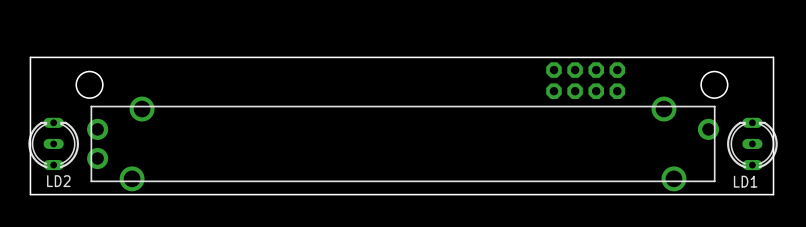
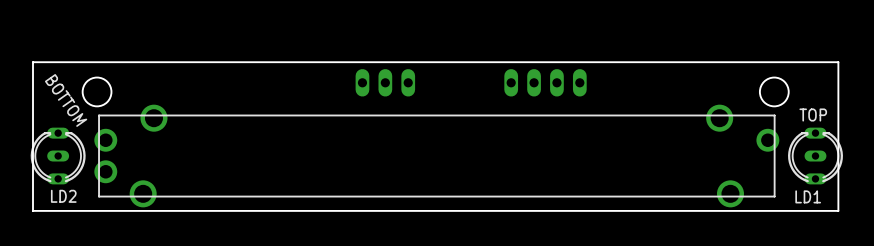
part: none -> (385, 82)
part: none -> (545, 82)
part: (585, 80) -> none
LD2 value: none -> BOTTOM (66, 100)
LD1 value: none -> TOP (813, 115)

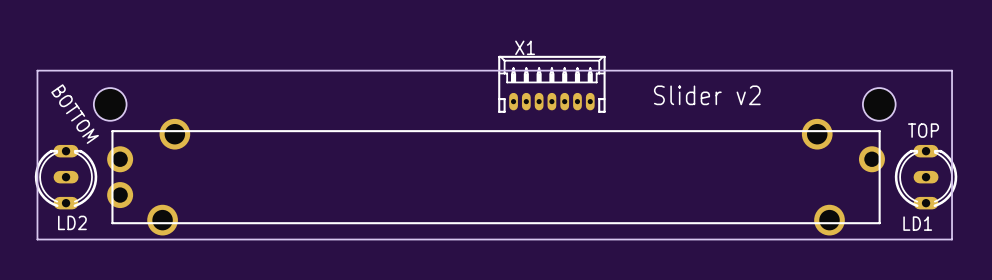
X1: none -> (551, 84)
part: (385, 82) -> none
part: (545, 82) -> none
text: none -> Slider v2 (707, 95)

